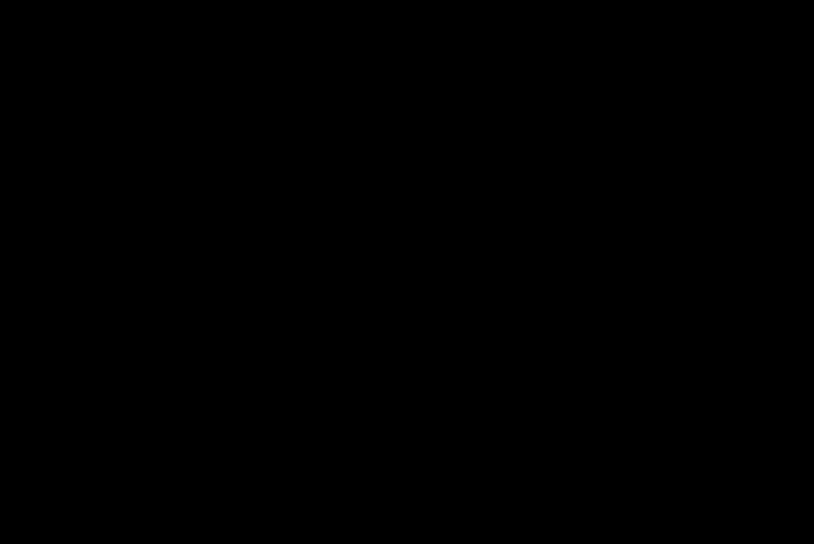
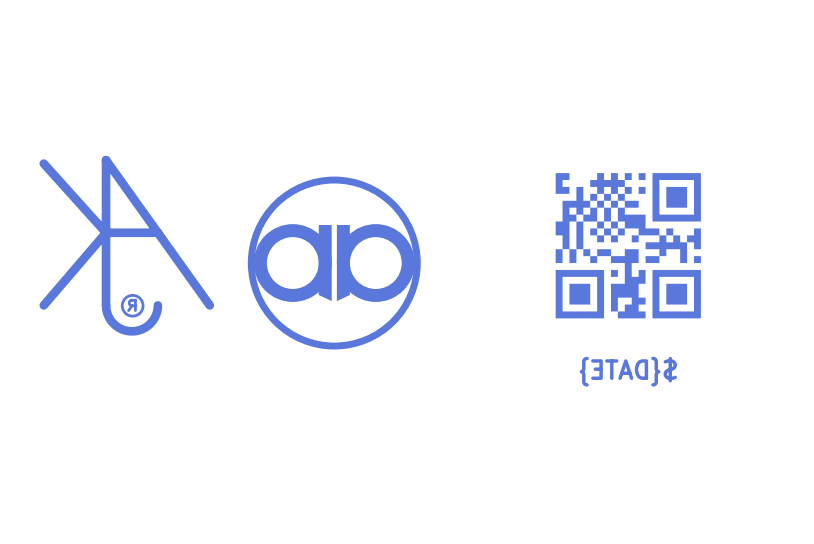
drawing: none -> [39, 155, 421, 350]
part: none -> (628, 245)

